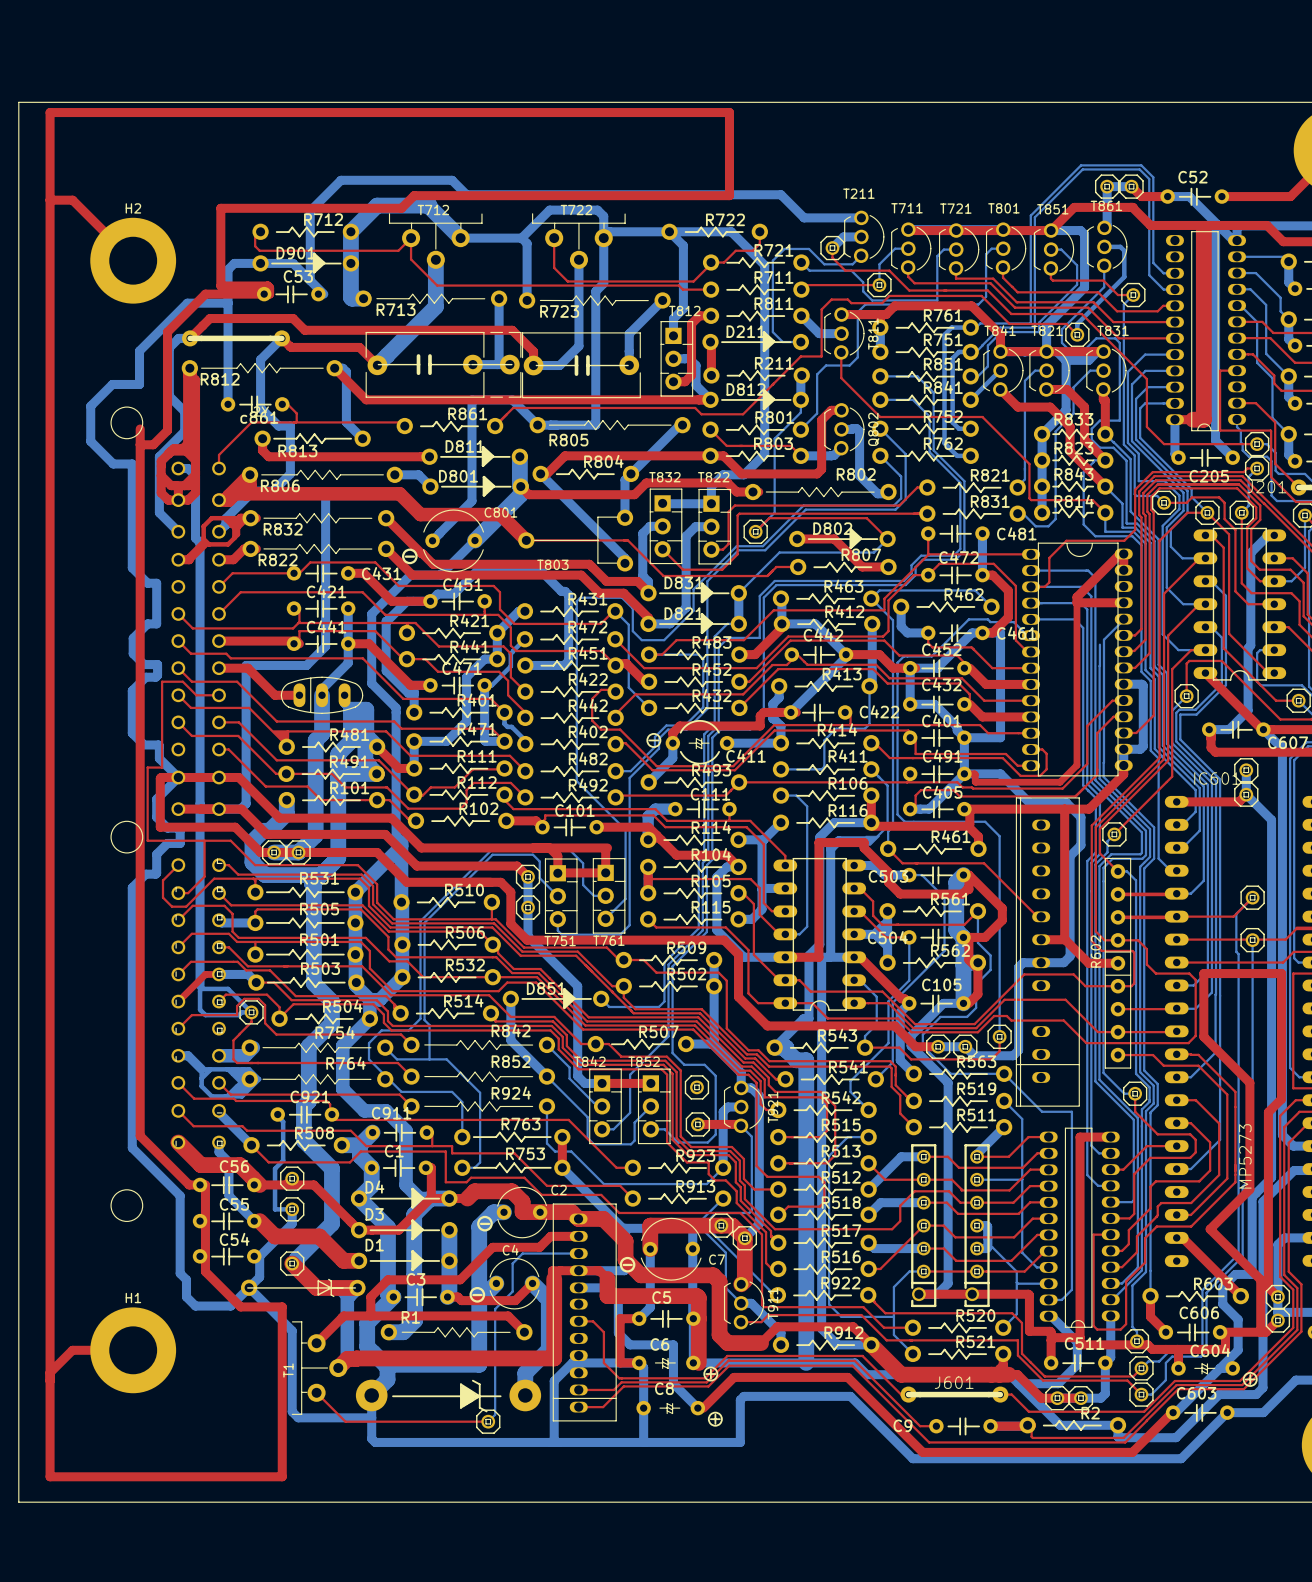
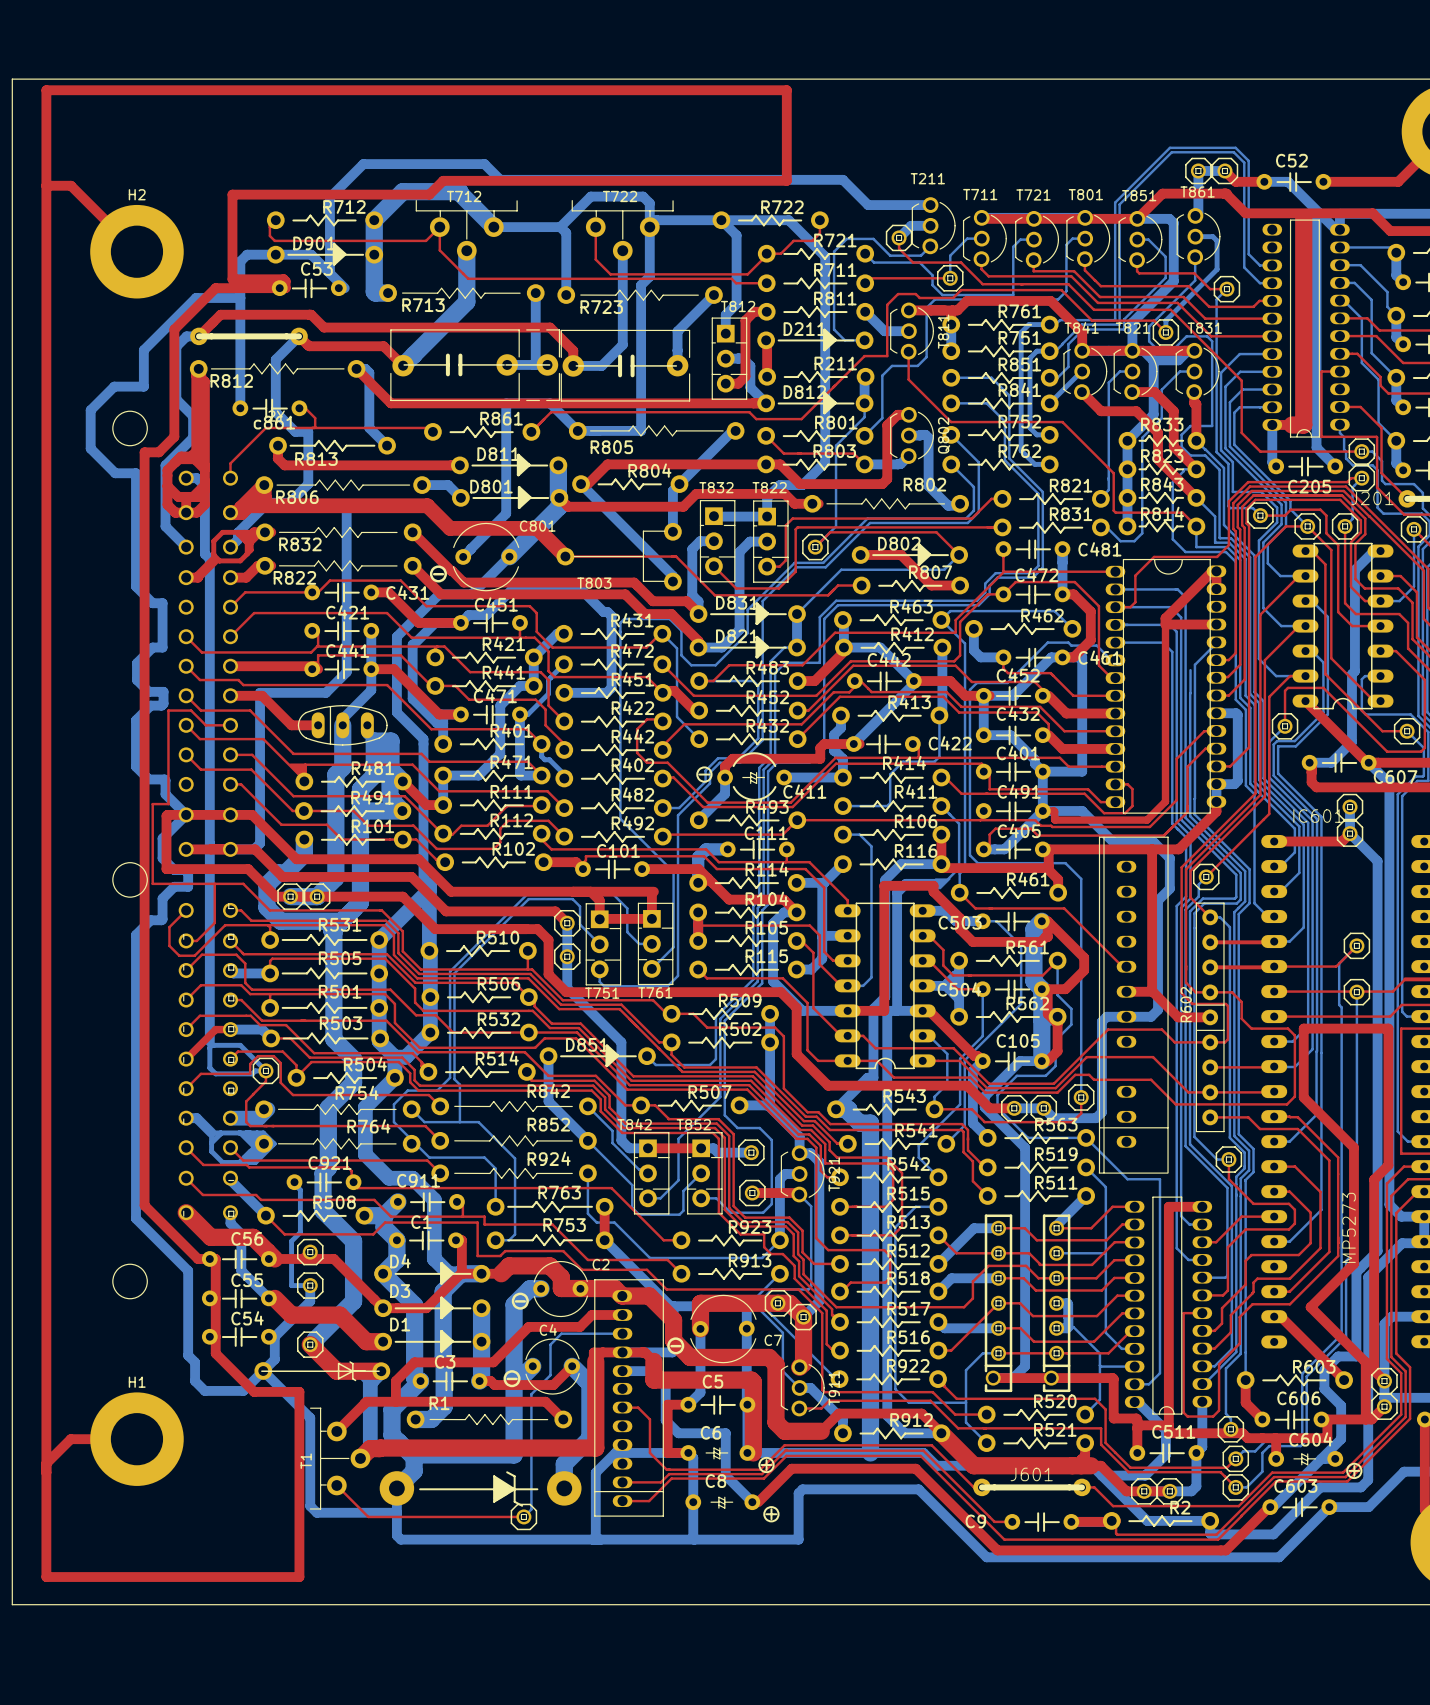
top track: (140, 428) (140, 444) -> none
bottom track: none -> (701, 1148) (713, 1148) (717, 1152) (751, 1152)

